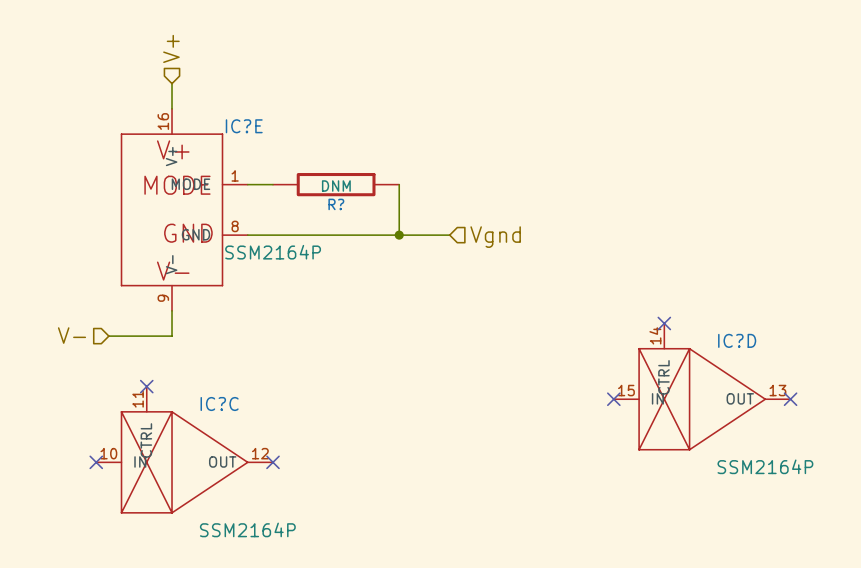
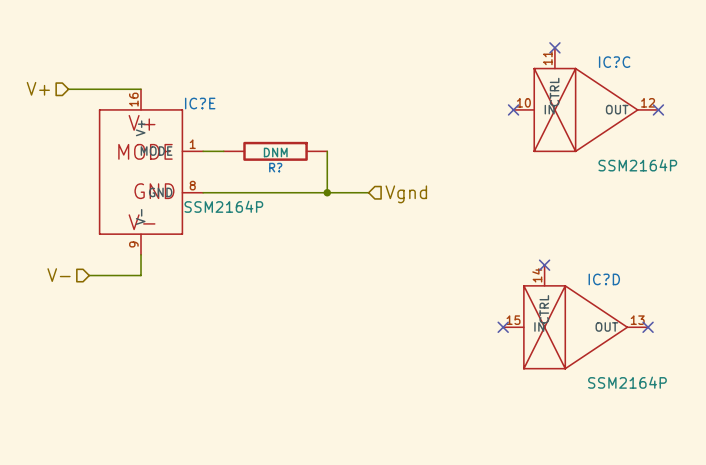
hierarchical label rotation: 0° (171, 48) -> 90° counterclockwise (38, 88)
hierarchical label position: V+ (171, 48) -> V+ (38, 88)
no-connect mark: none -> (554, 47)
wire: (172, 83) (172, 108) -> (68, 89) (141, 89)
IC?C: none -> SSM2164P (585, 99)
no-connect mark: none -> (513, 109)
no-connect mark: none -> (658, 109)
no-connect mark: (146, 386) -> none
IC?C: SSM2164P (184, 449) -> none
no-connect mark: (96, 462) -> none
no-connect mark: (272, 462) -> none

